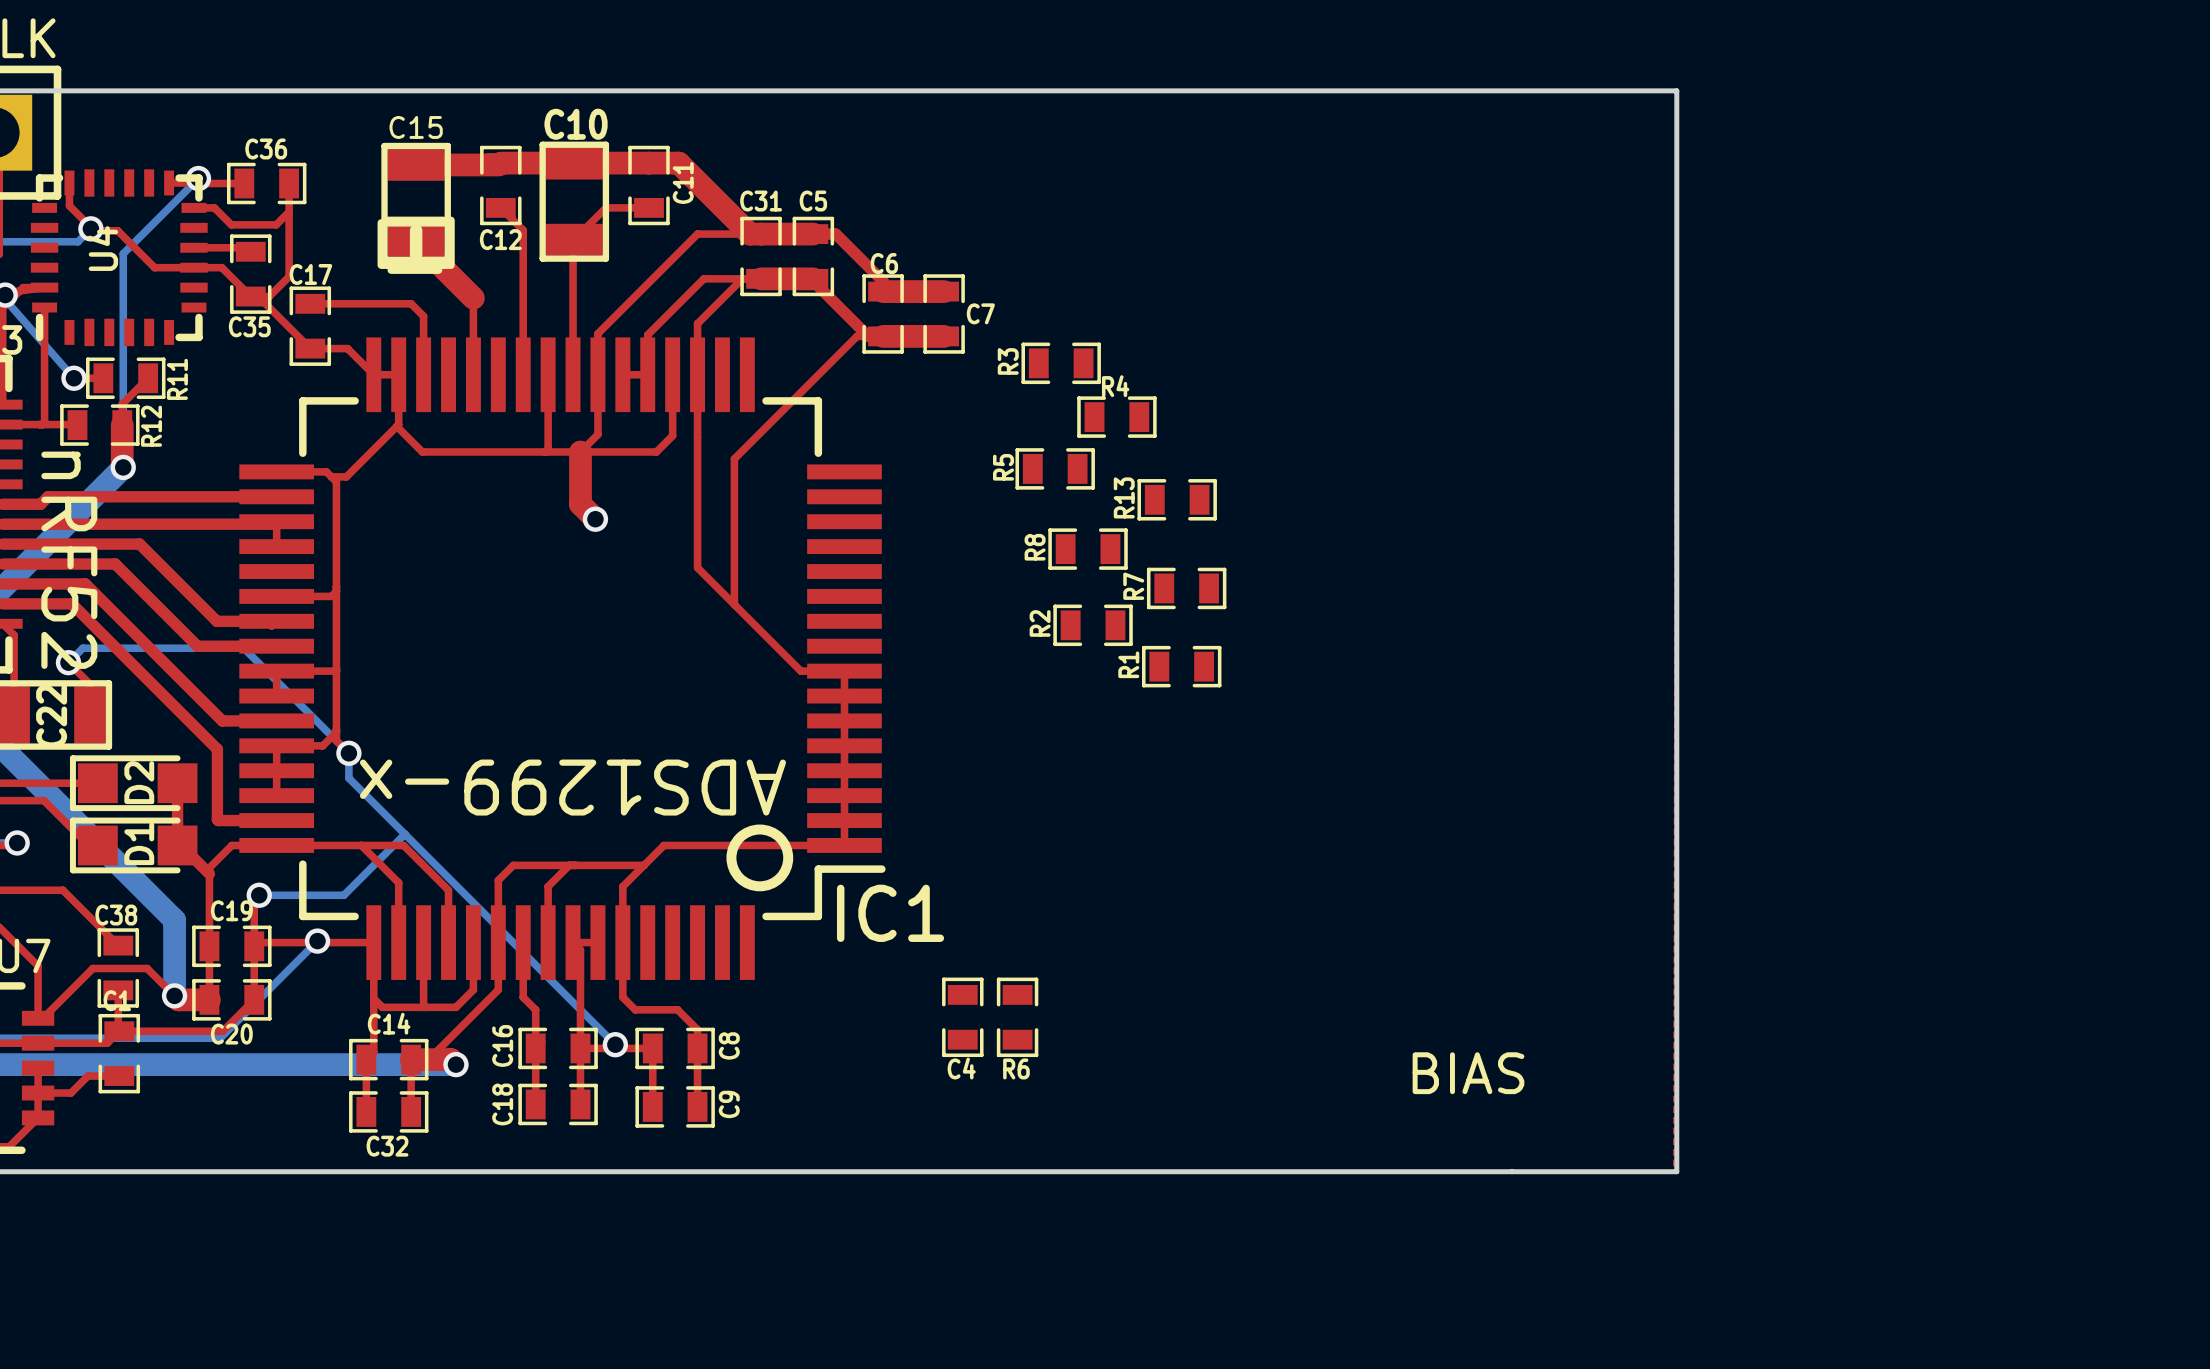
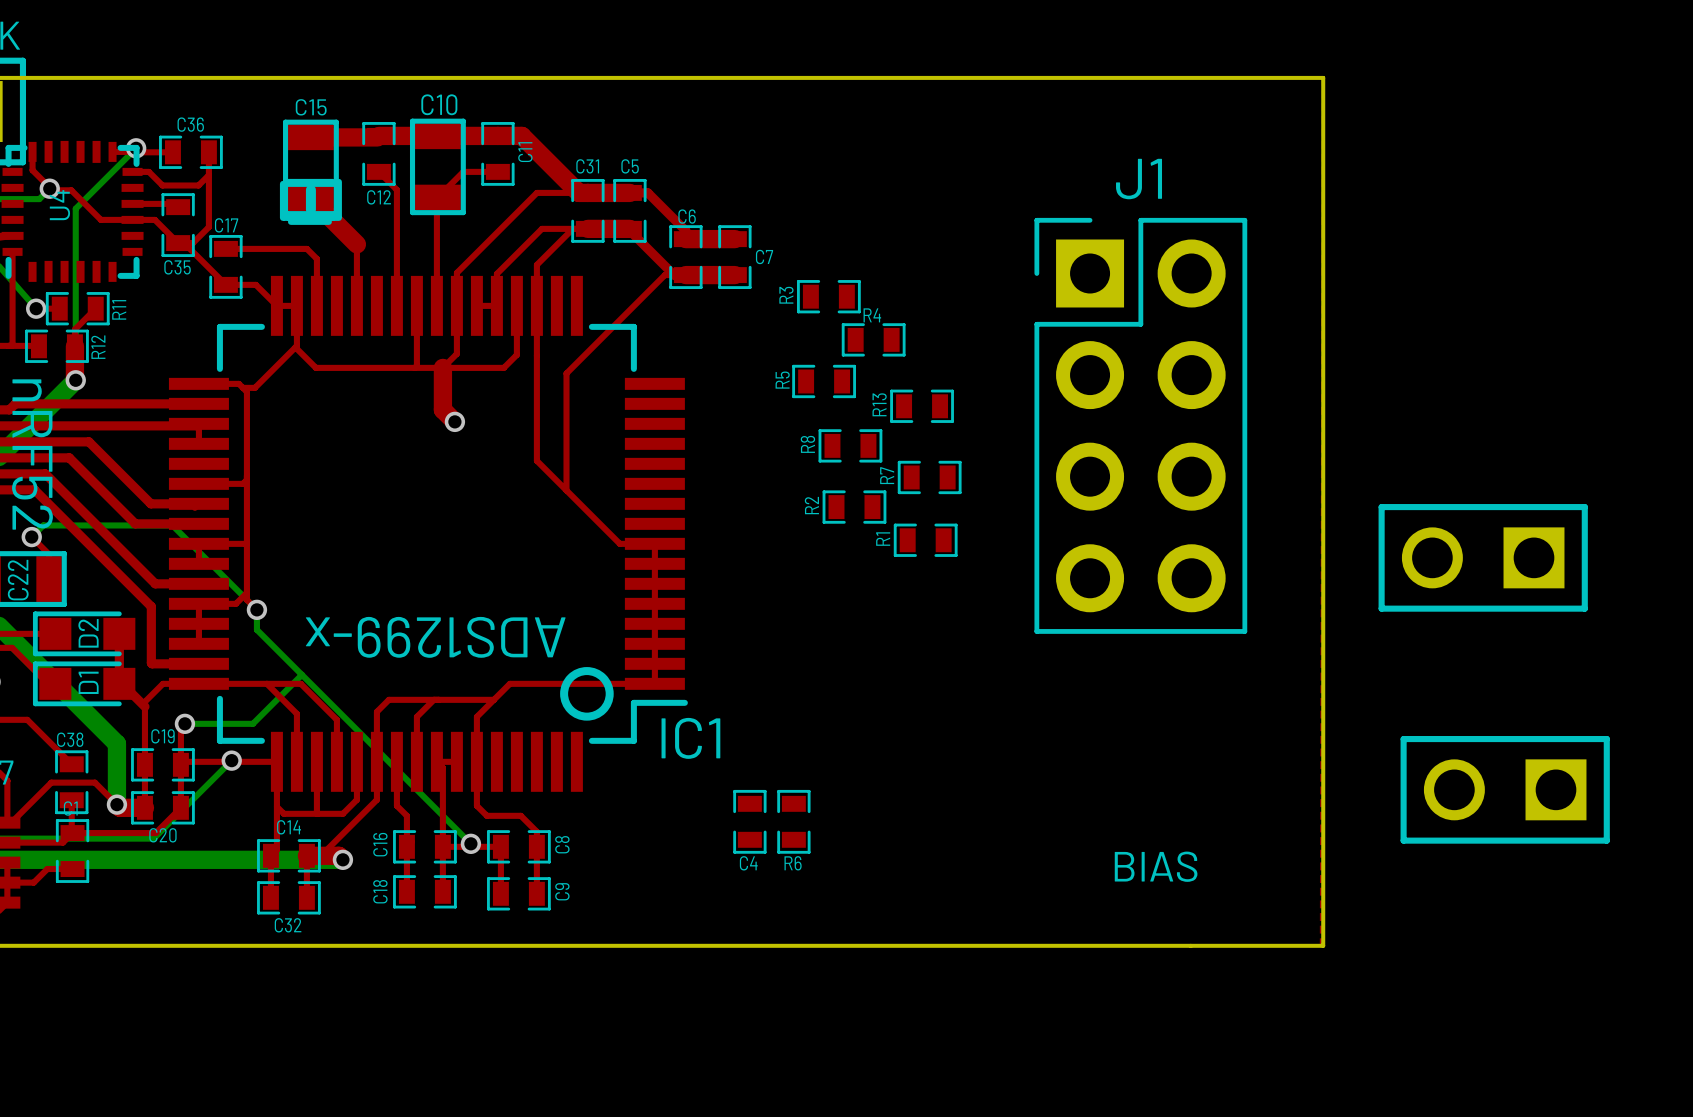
J1: none -> (1140, 425)
part: none -> (1483, 557)
part: none -> (1505, 789)

